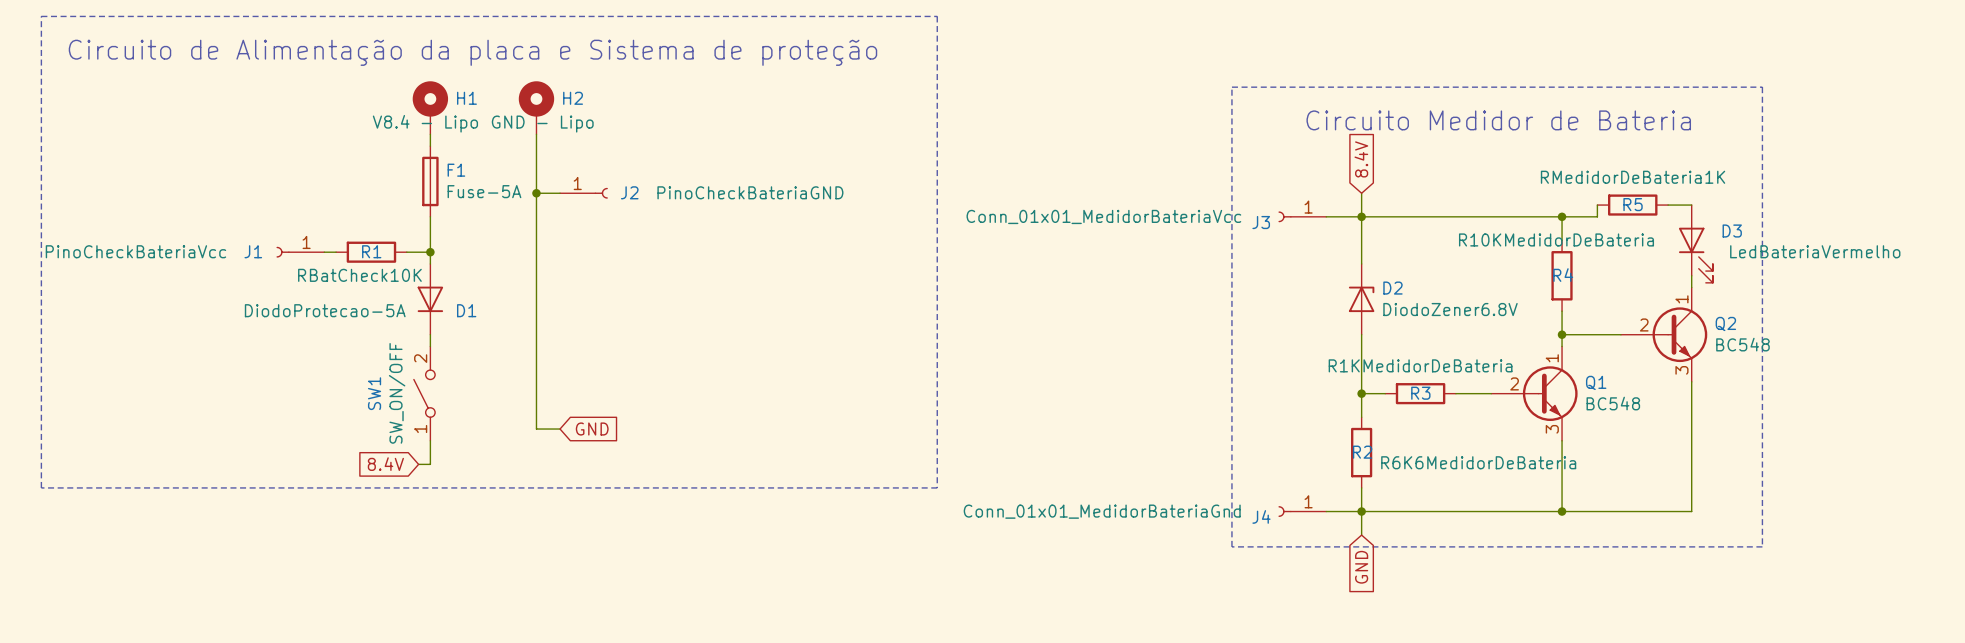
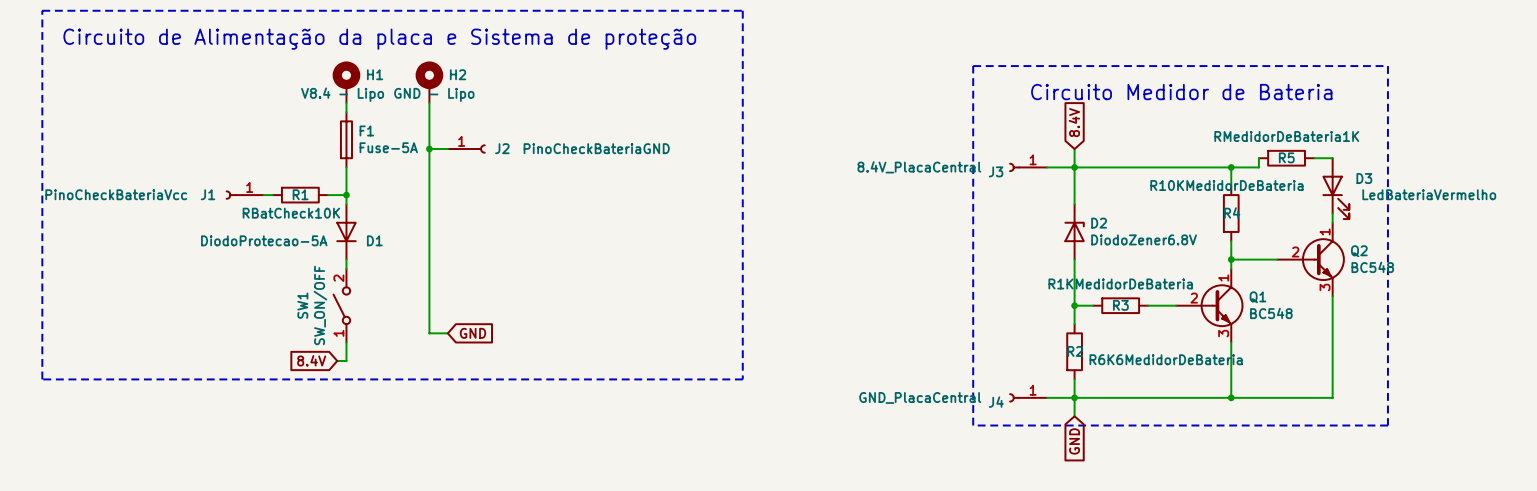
J3 value: Conn_01x01_MedidorBateriaVcc (1103, 216) -> 8.4V_PlacaCentral (919, 167)
J4 value: Conn_01x01_MedidorBateriaGnd (1102, 511) -> GND_PlacaCentral (920, 397)

